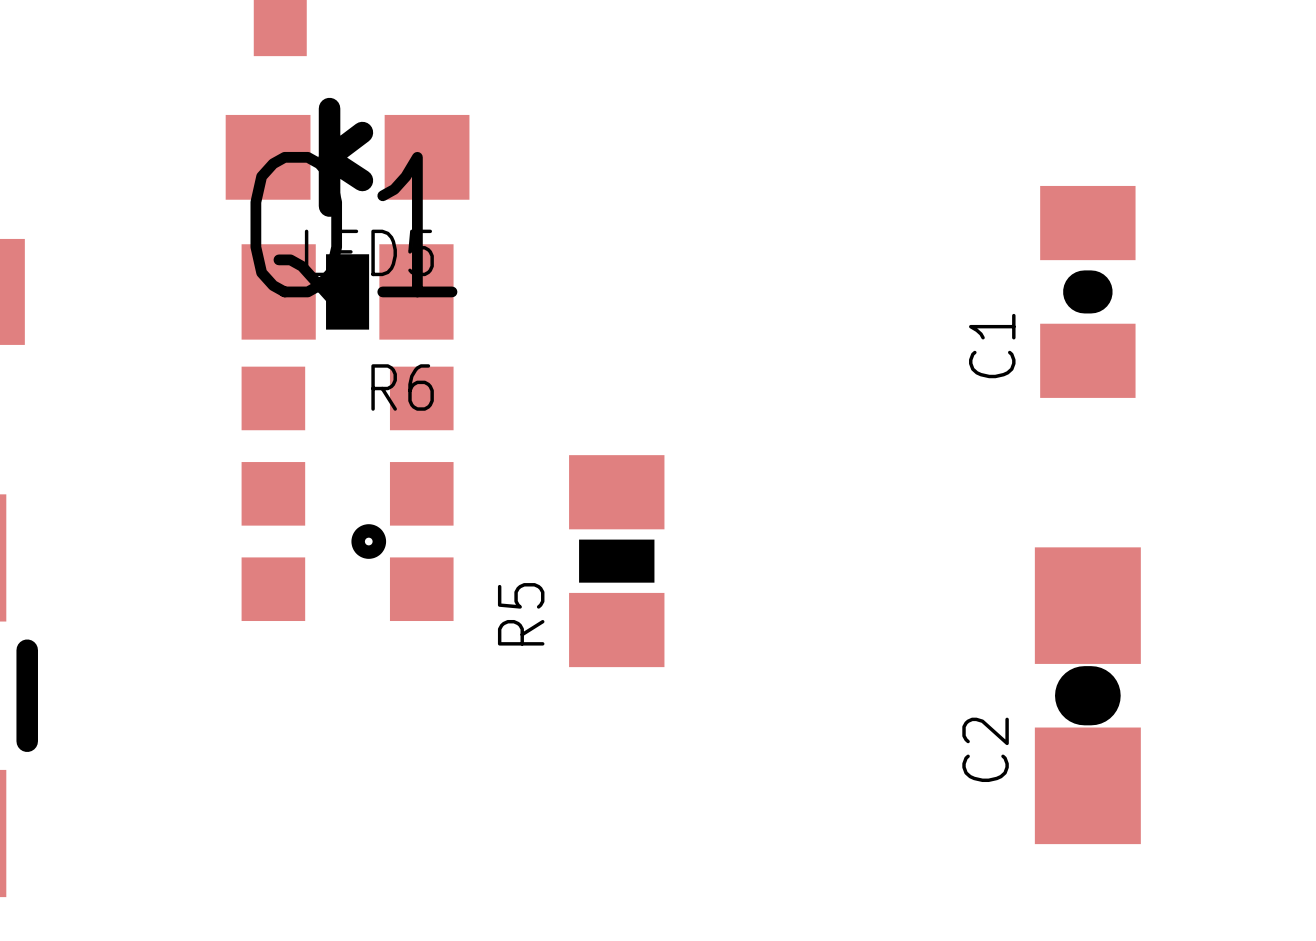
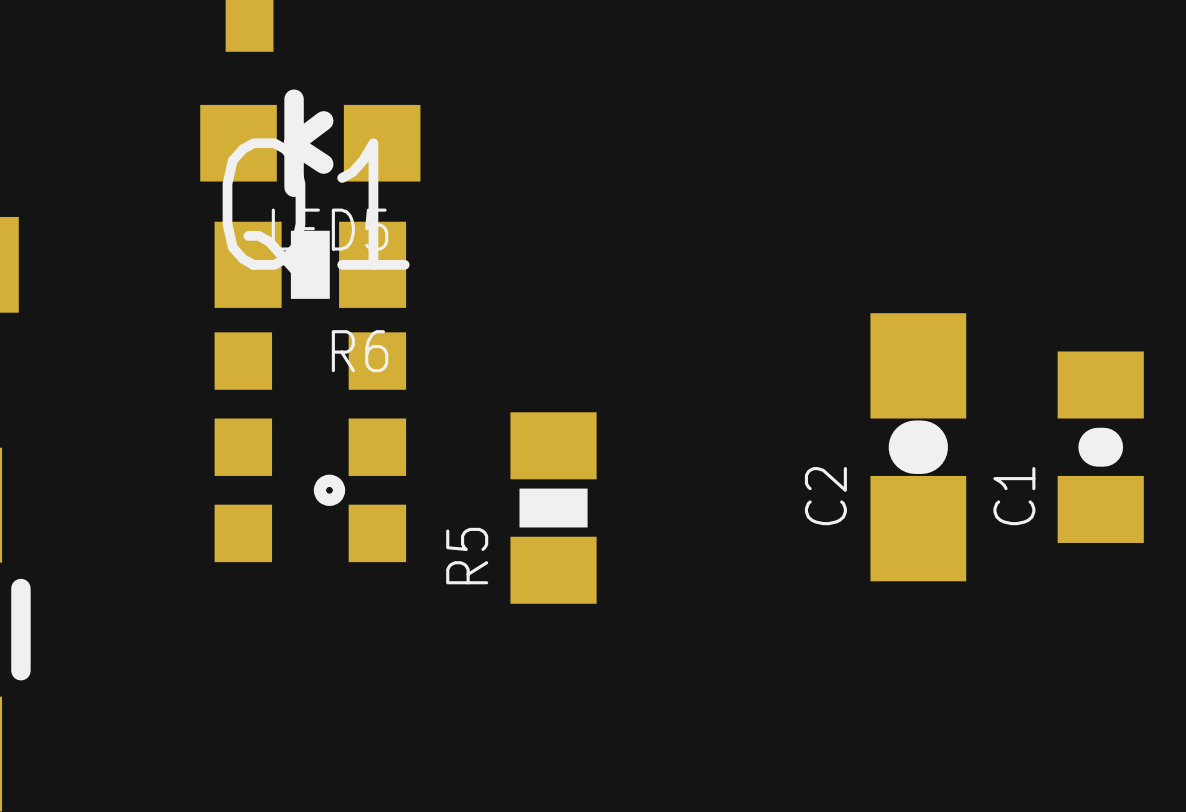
C1 position: (1087, 291) -> (1100, 447)
C2 position: (1087, 695) -> (918, 447)

